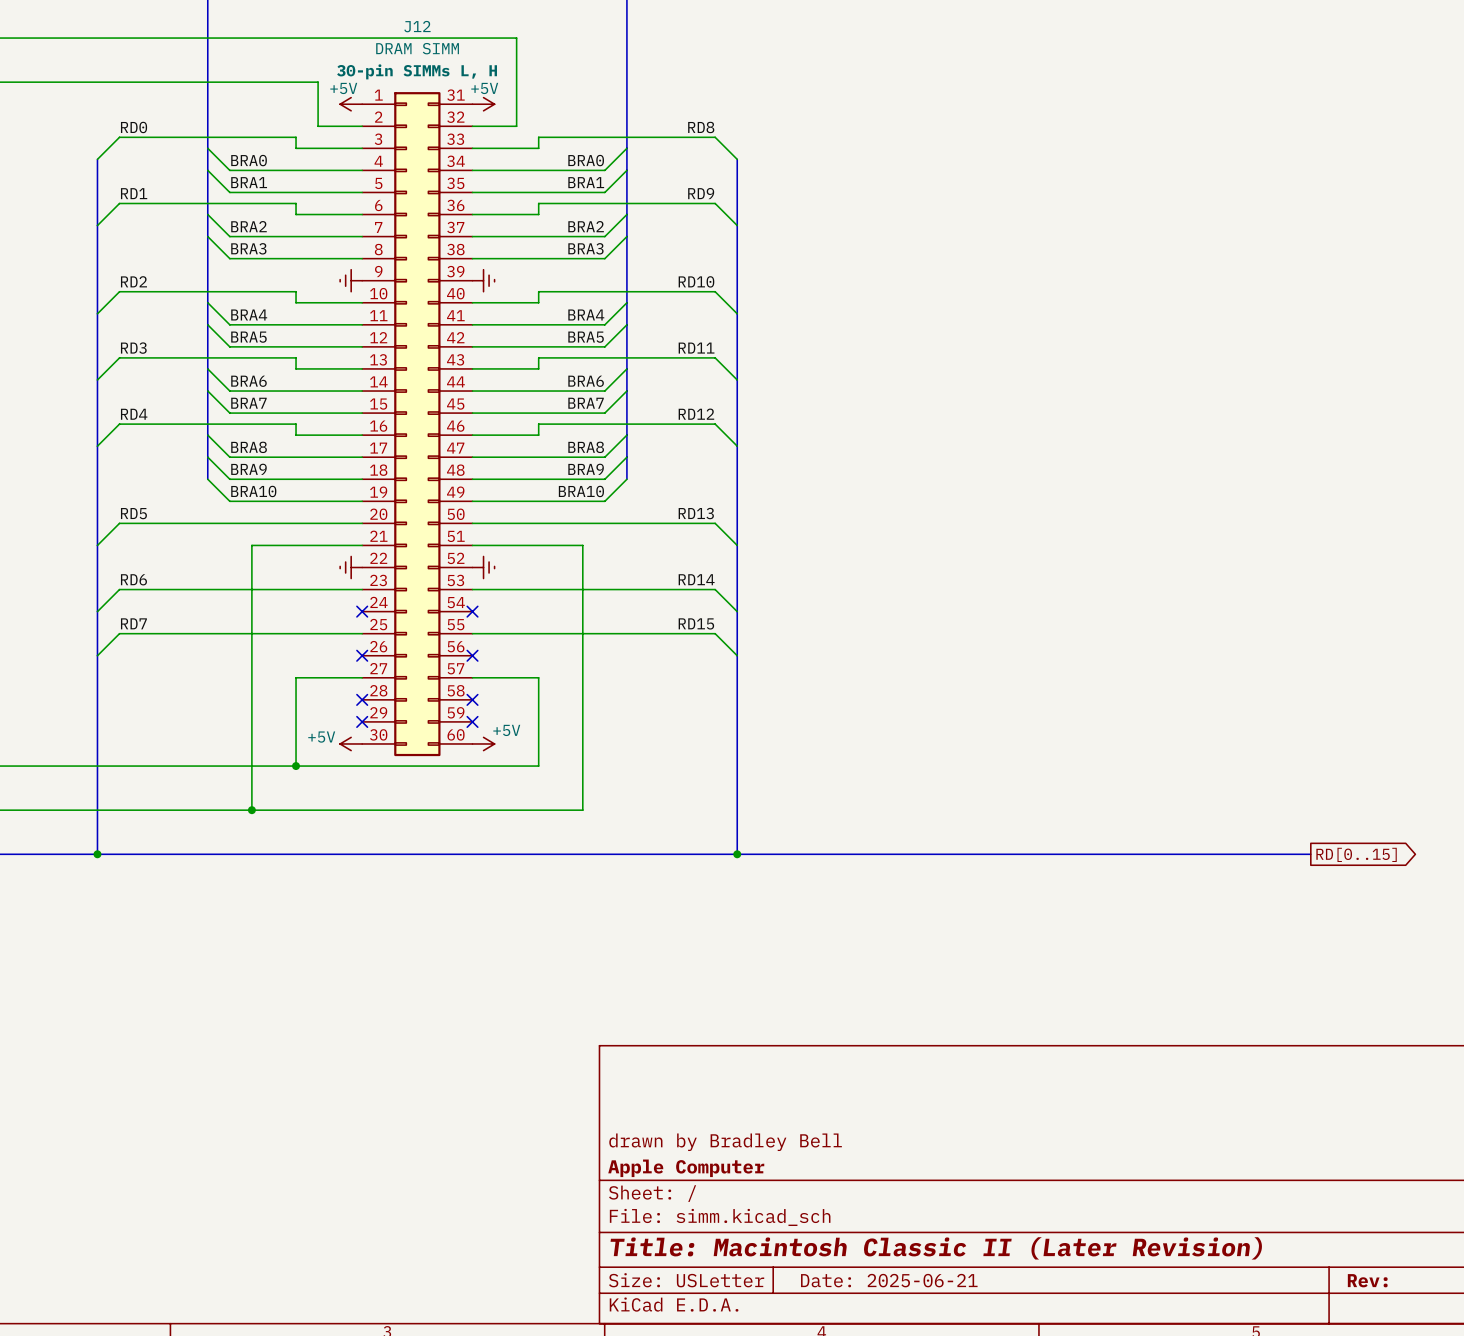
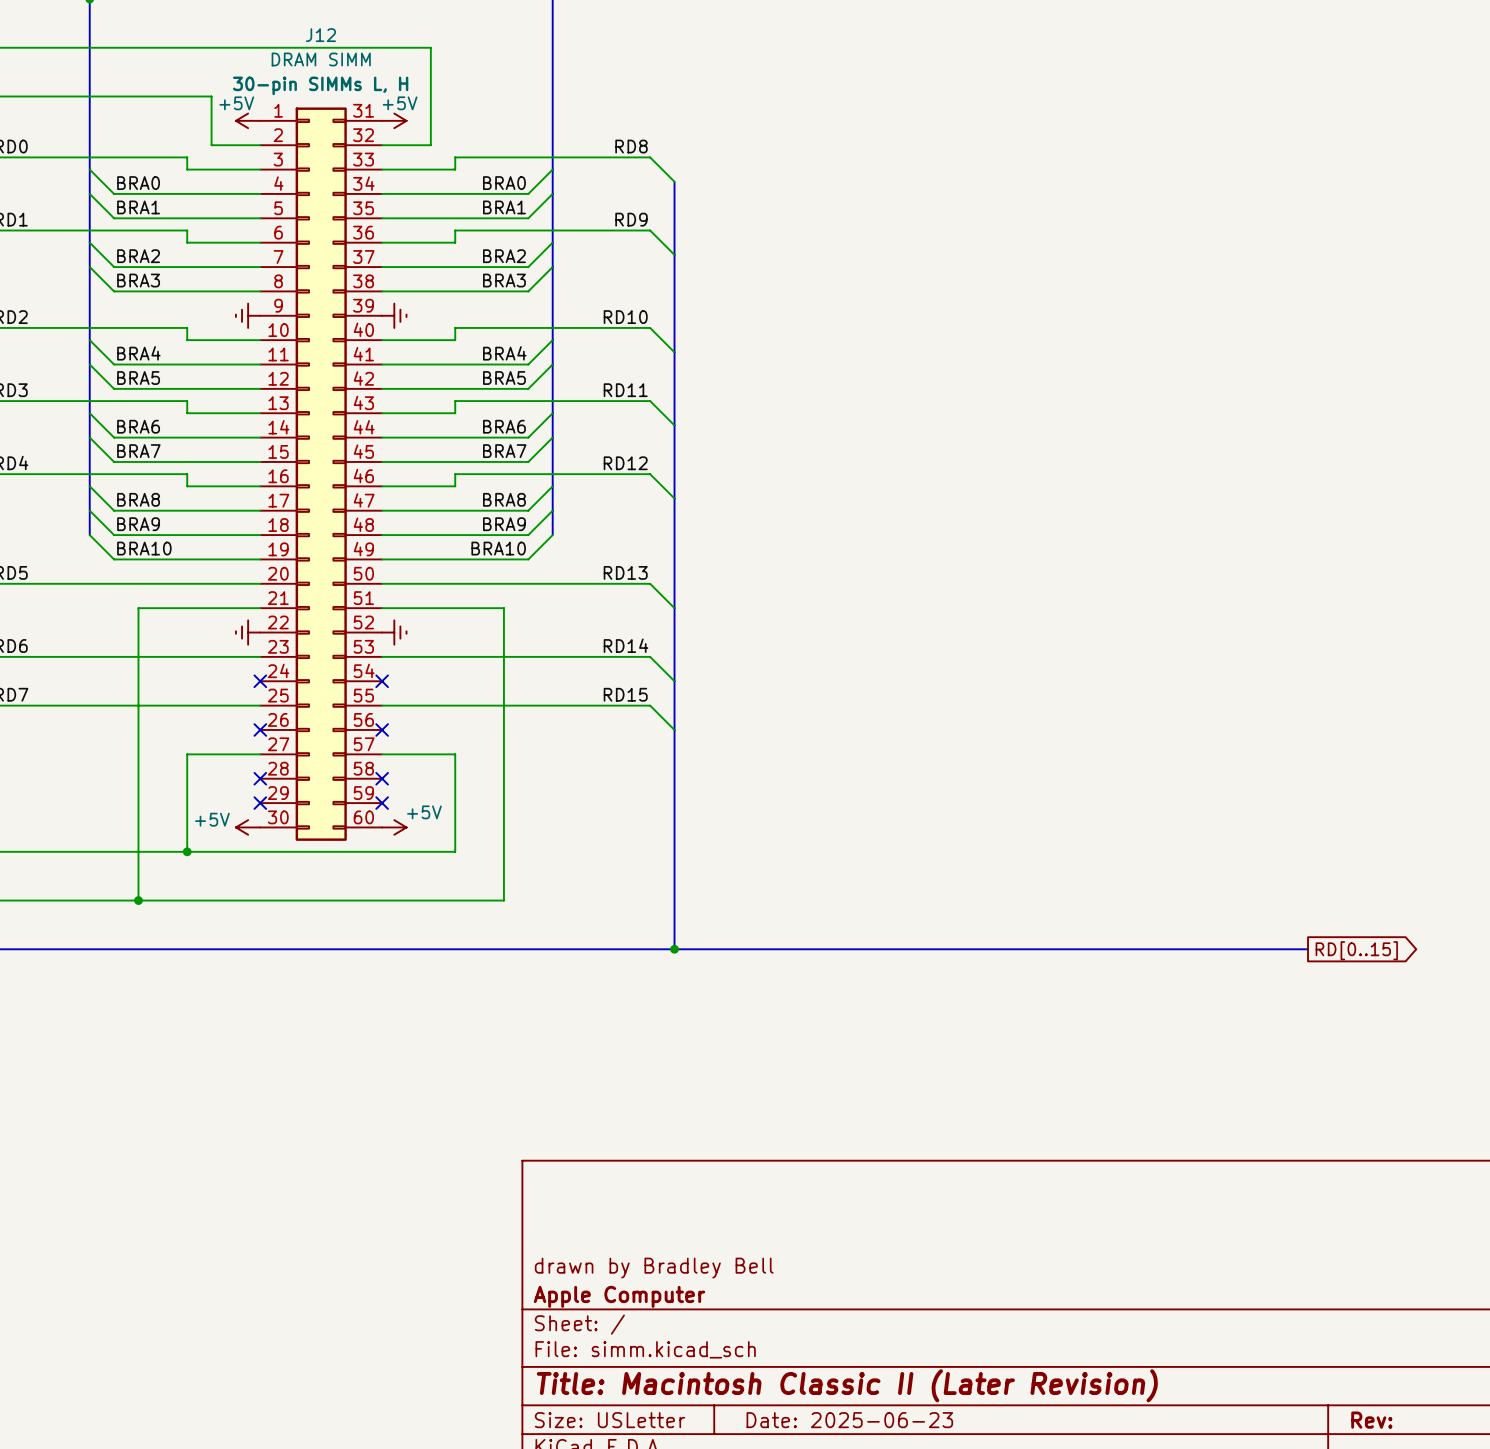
title block: Date: 2025-06-21 (889, 1280) -> Date: 2025-06-23 (849, 1420)

